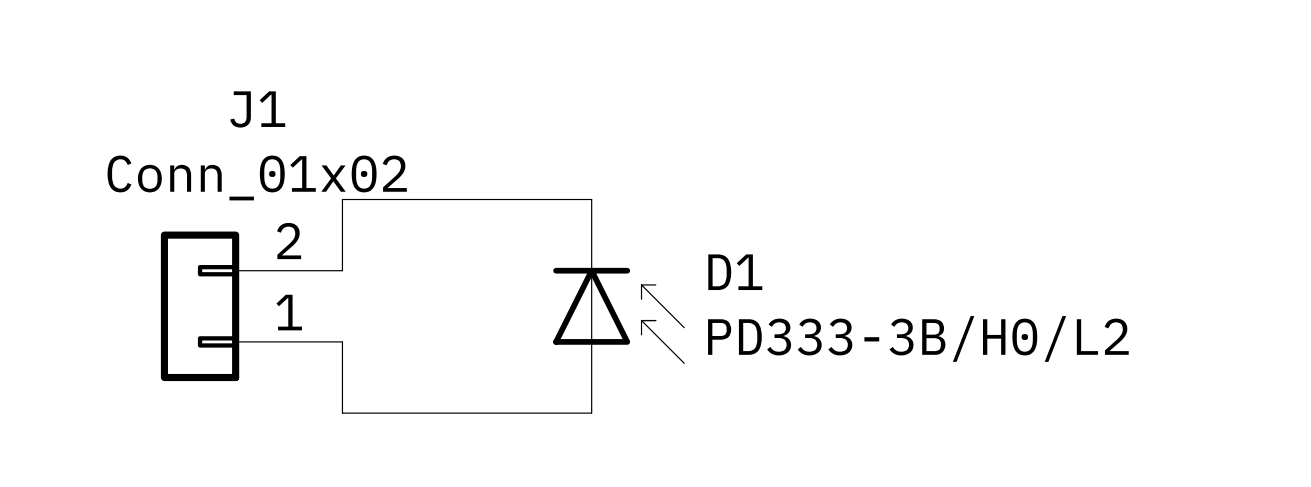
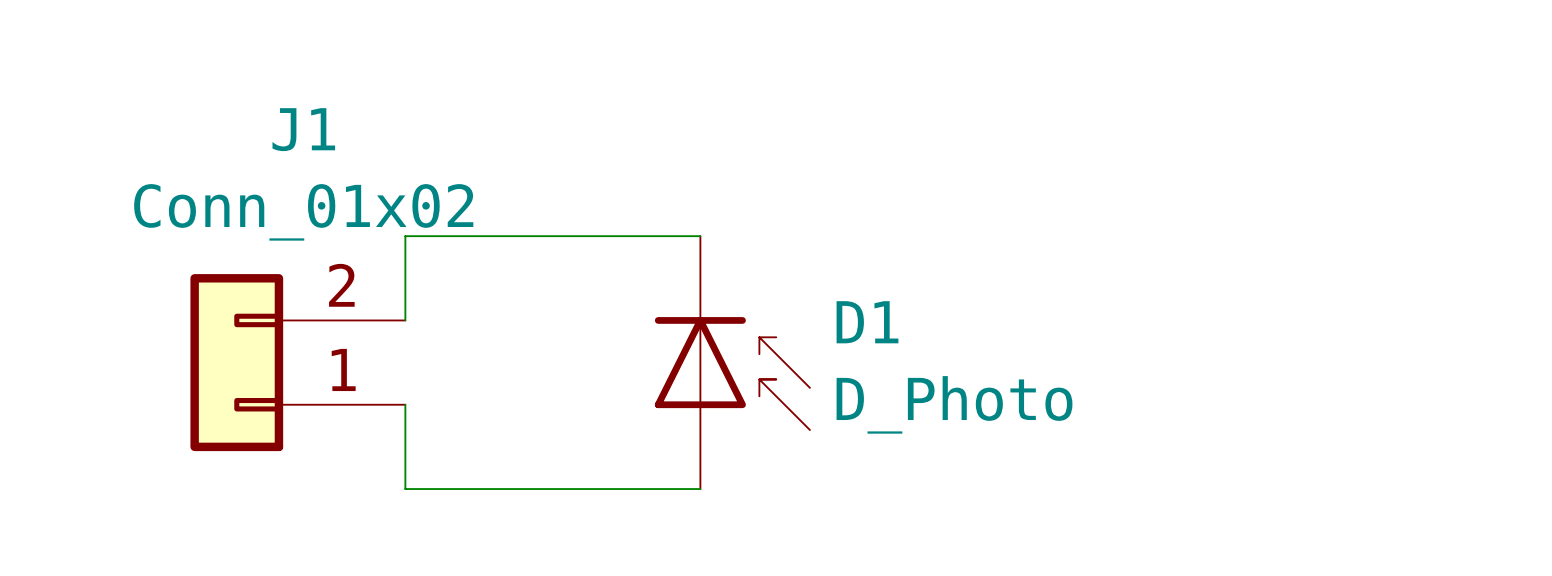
D1 value: PD333-3B/H0/L2 (918, 338) -> D_Photo (954, 404)

